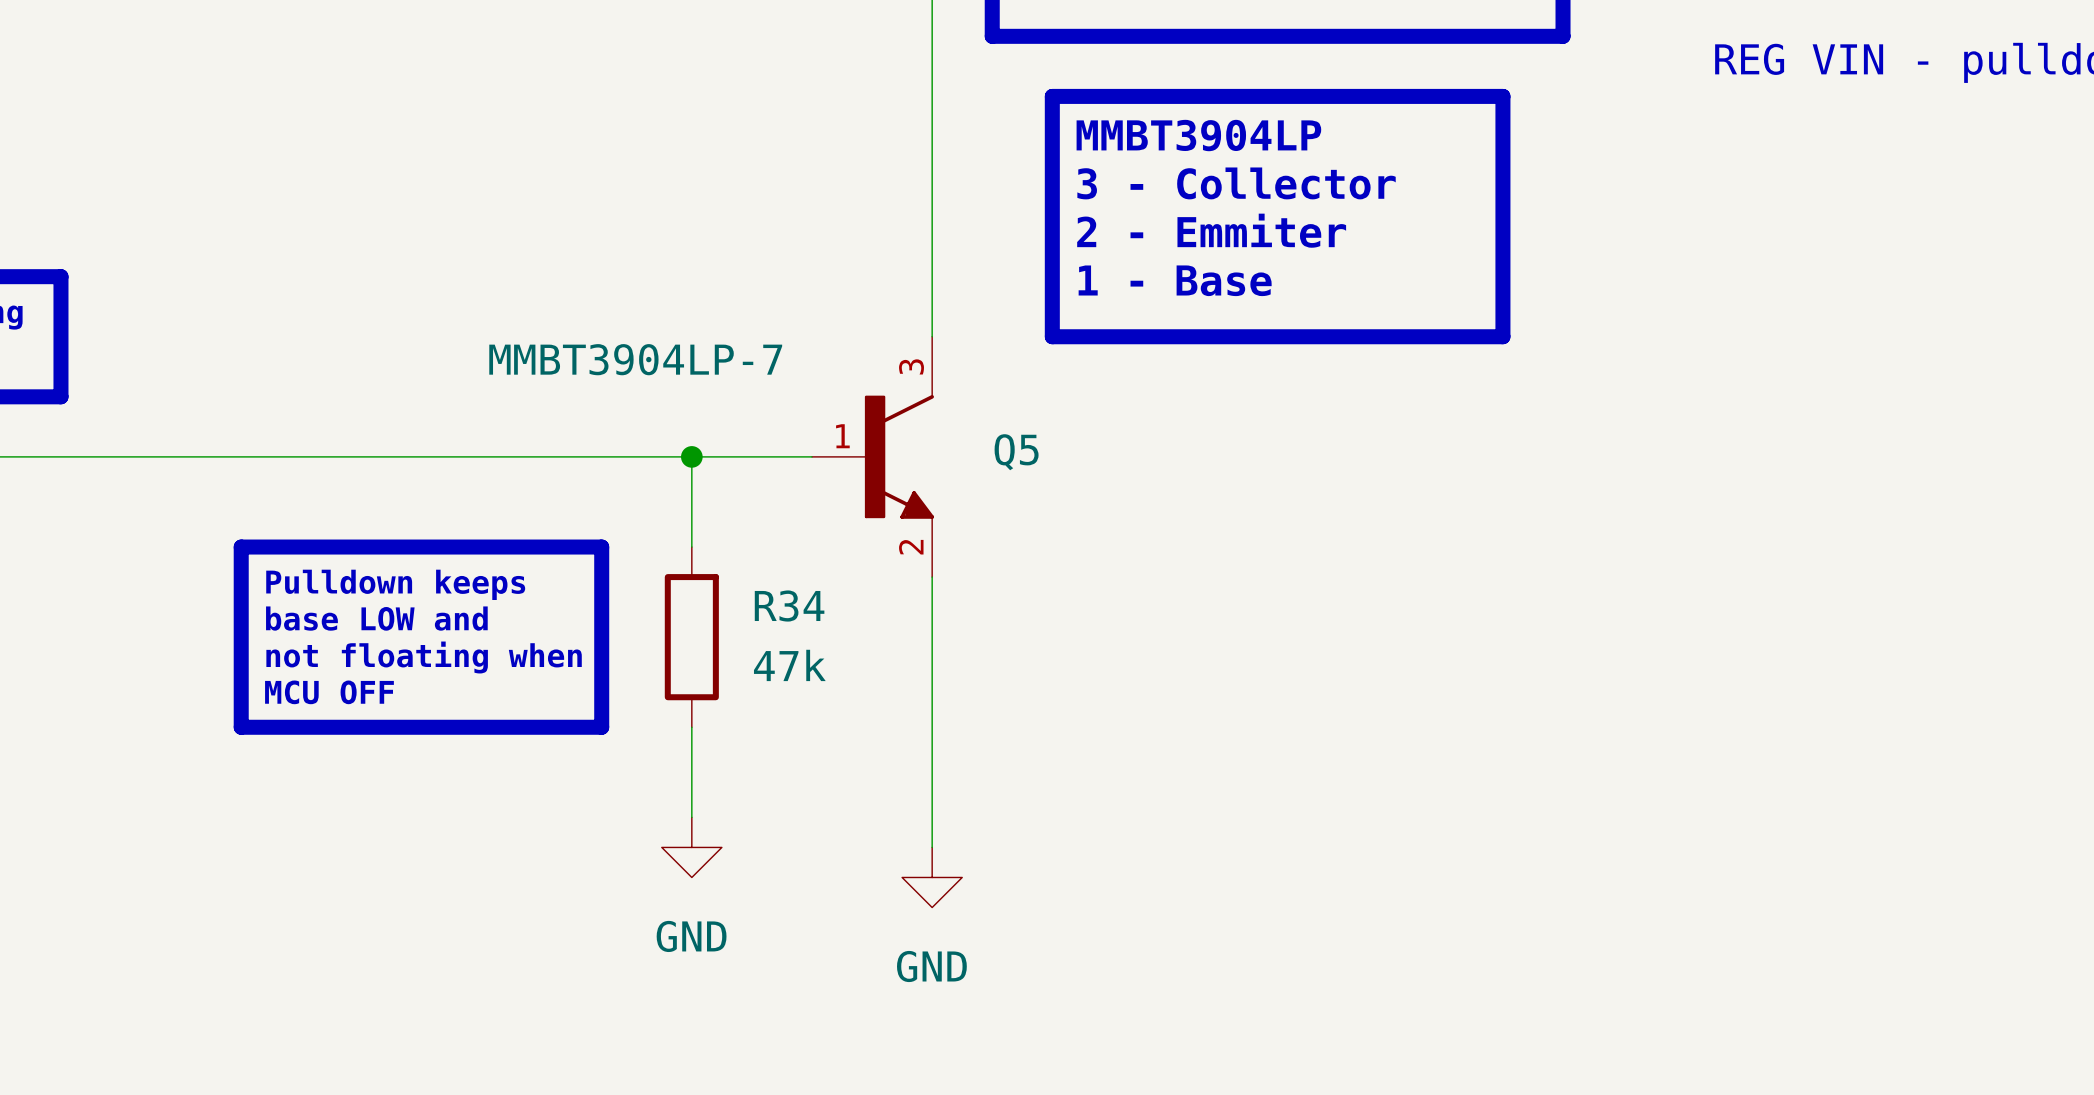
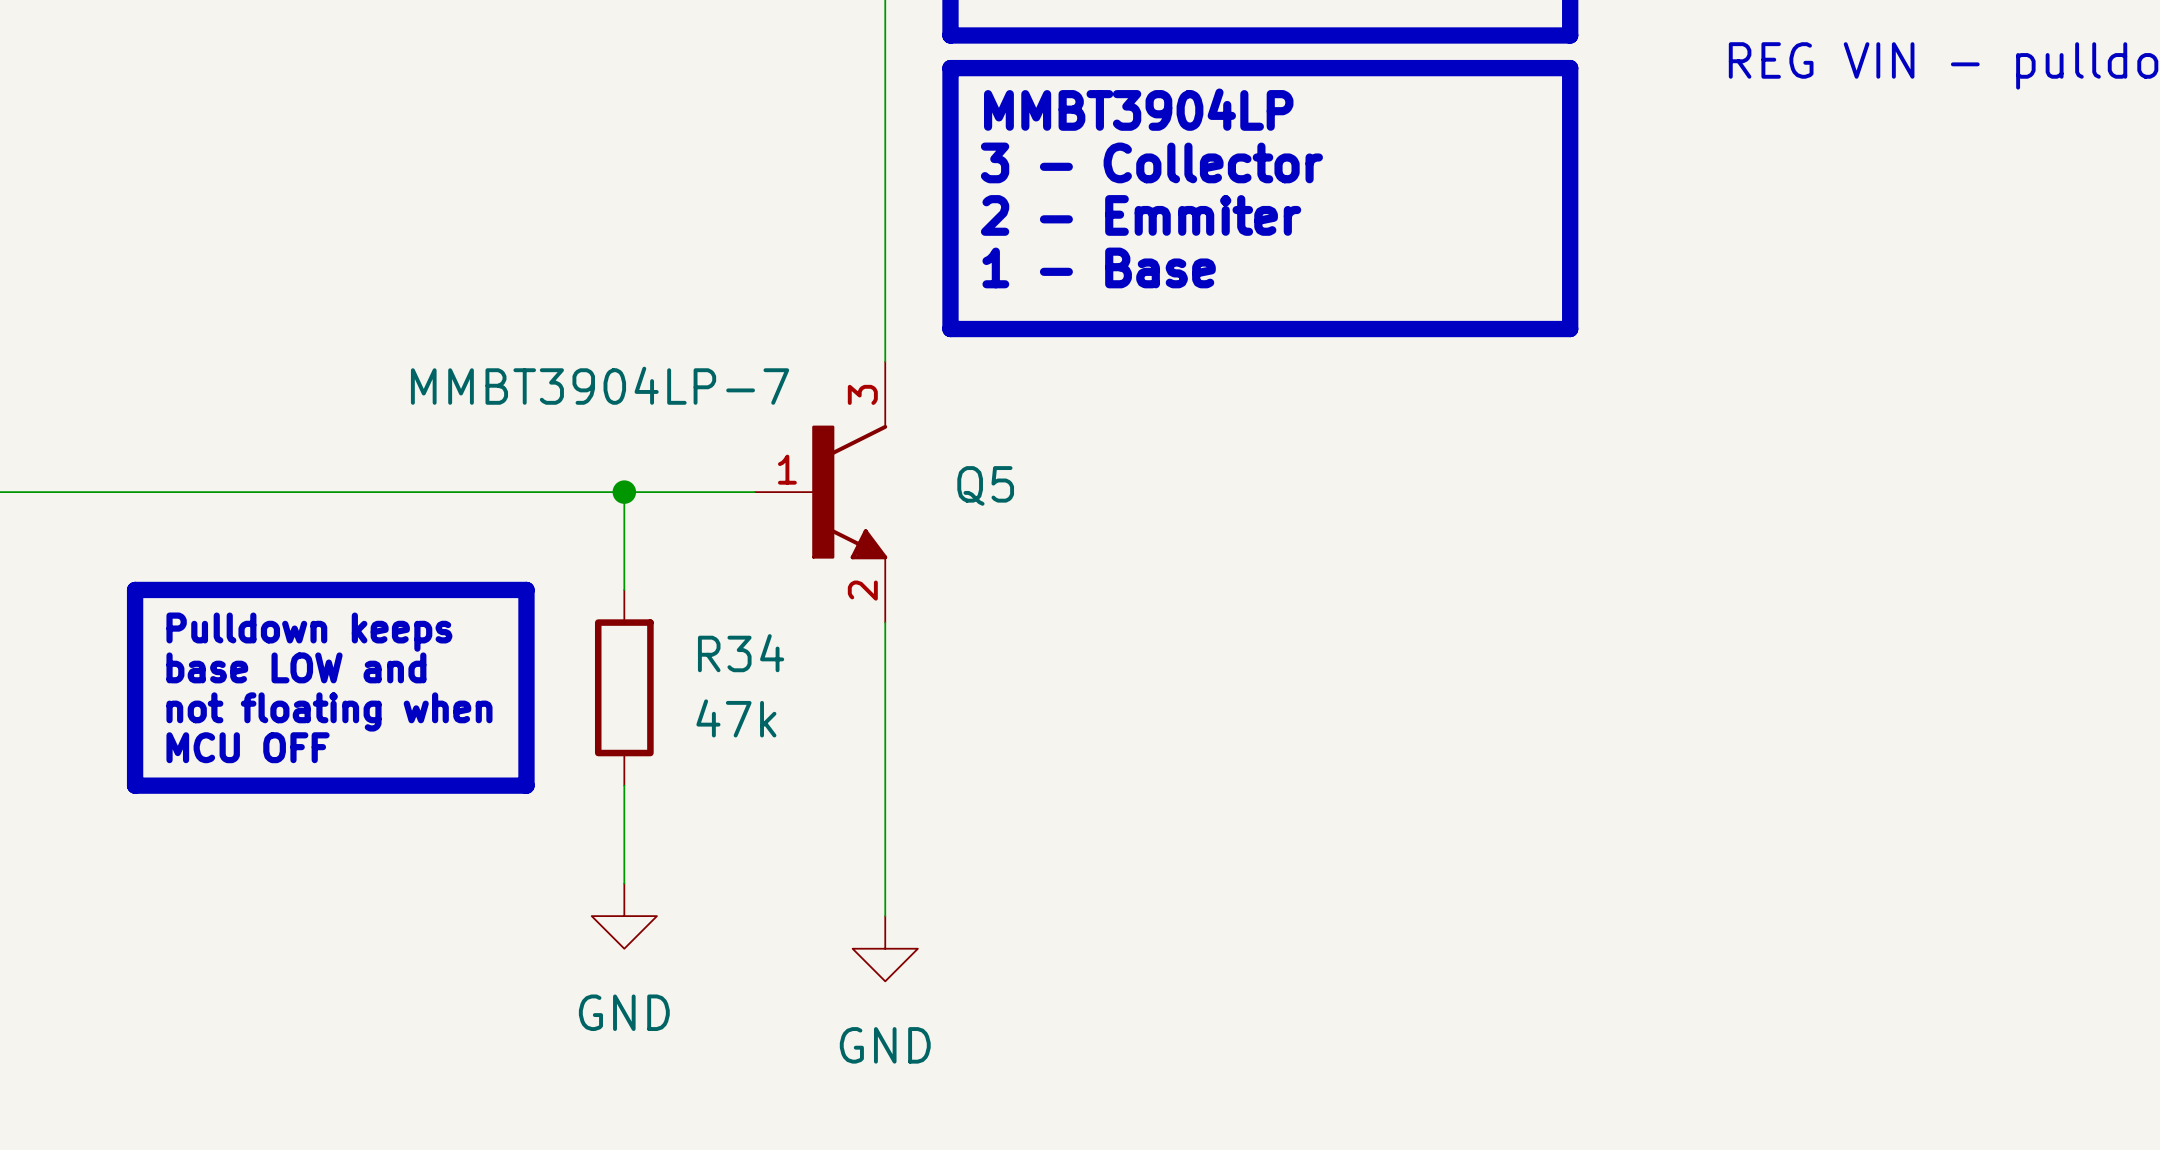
line: (1052, 96) (1502, 96) (1502, 336) (1052, 336) (1052, 96) -> (950, 68) (950, 329) (1570, 329) (1570, 68) (950, 68)
text position: MMBT3904LP (1198, 135) -> MMBT3904LP (1138, 109)
text position: 3 - Collector (1236, 183) -> 3 - Collector (1151, 162)
text position: 2 - Emmiter (1211, 230) -> 2 - Emmiter (1141, 215)
text position: 1 - Base (1175, 280) -> 1 - Base (1099, 267)

